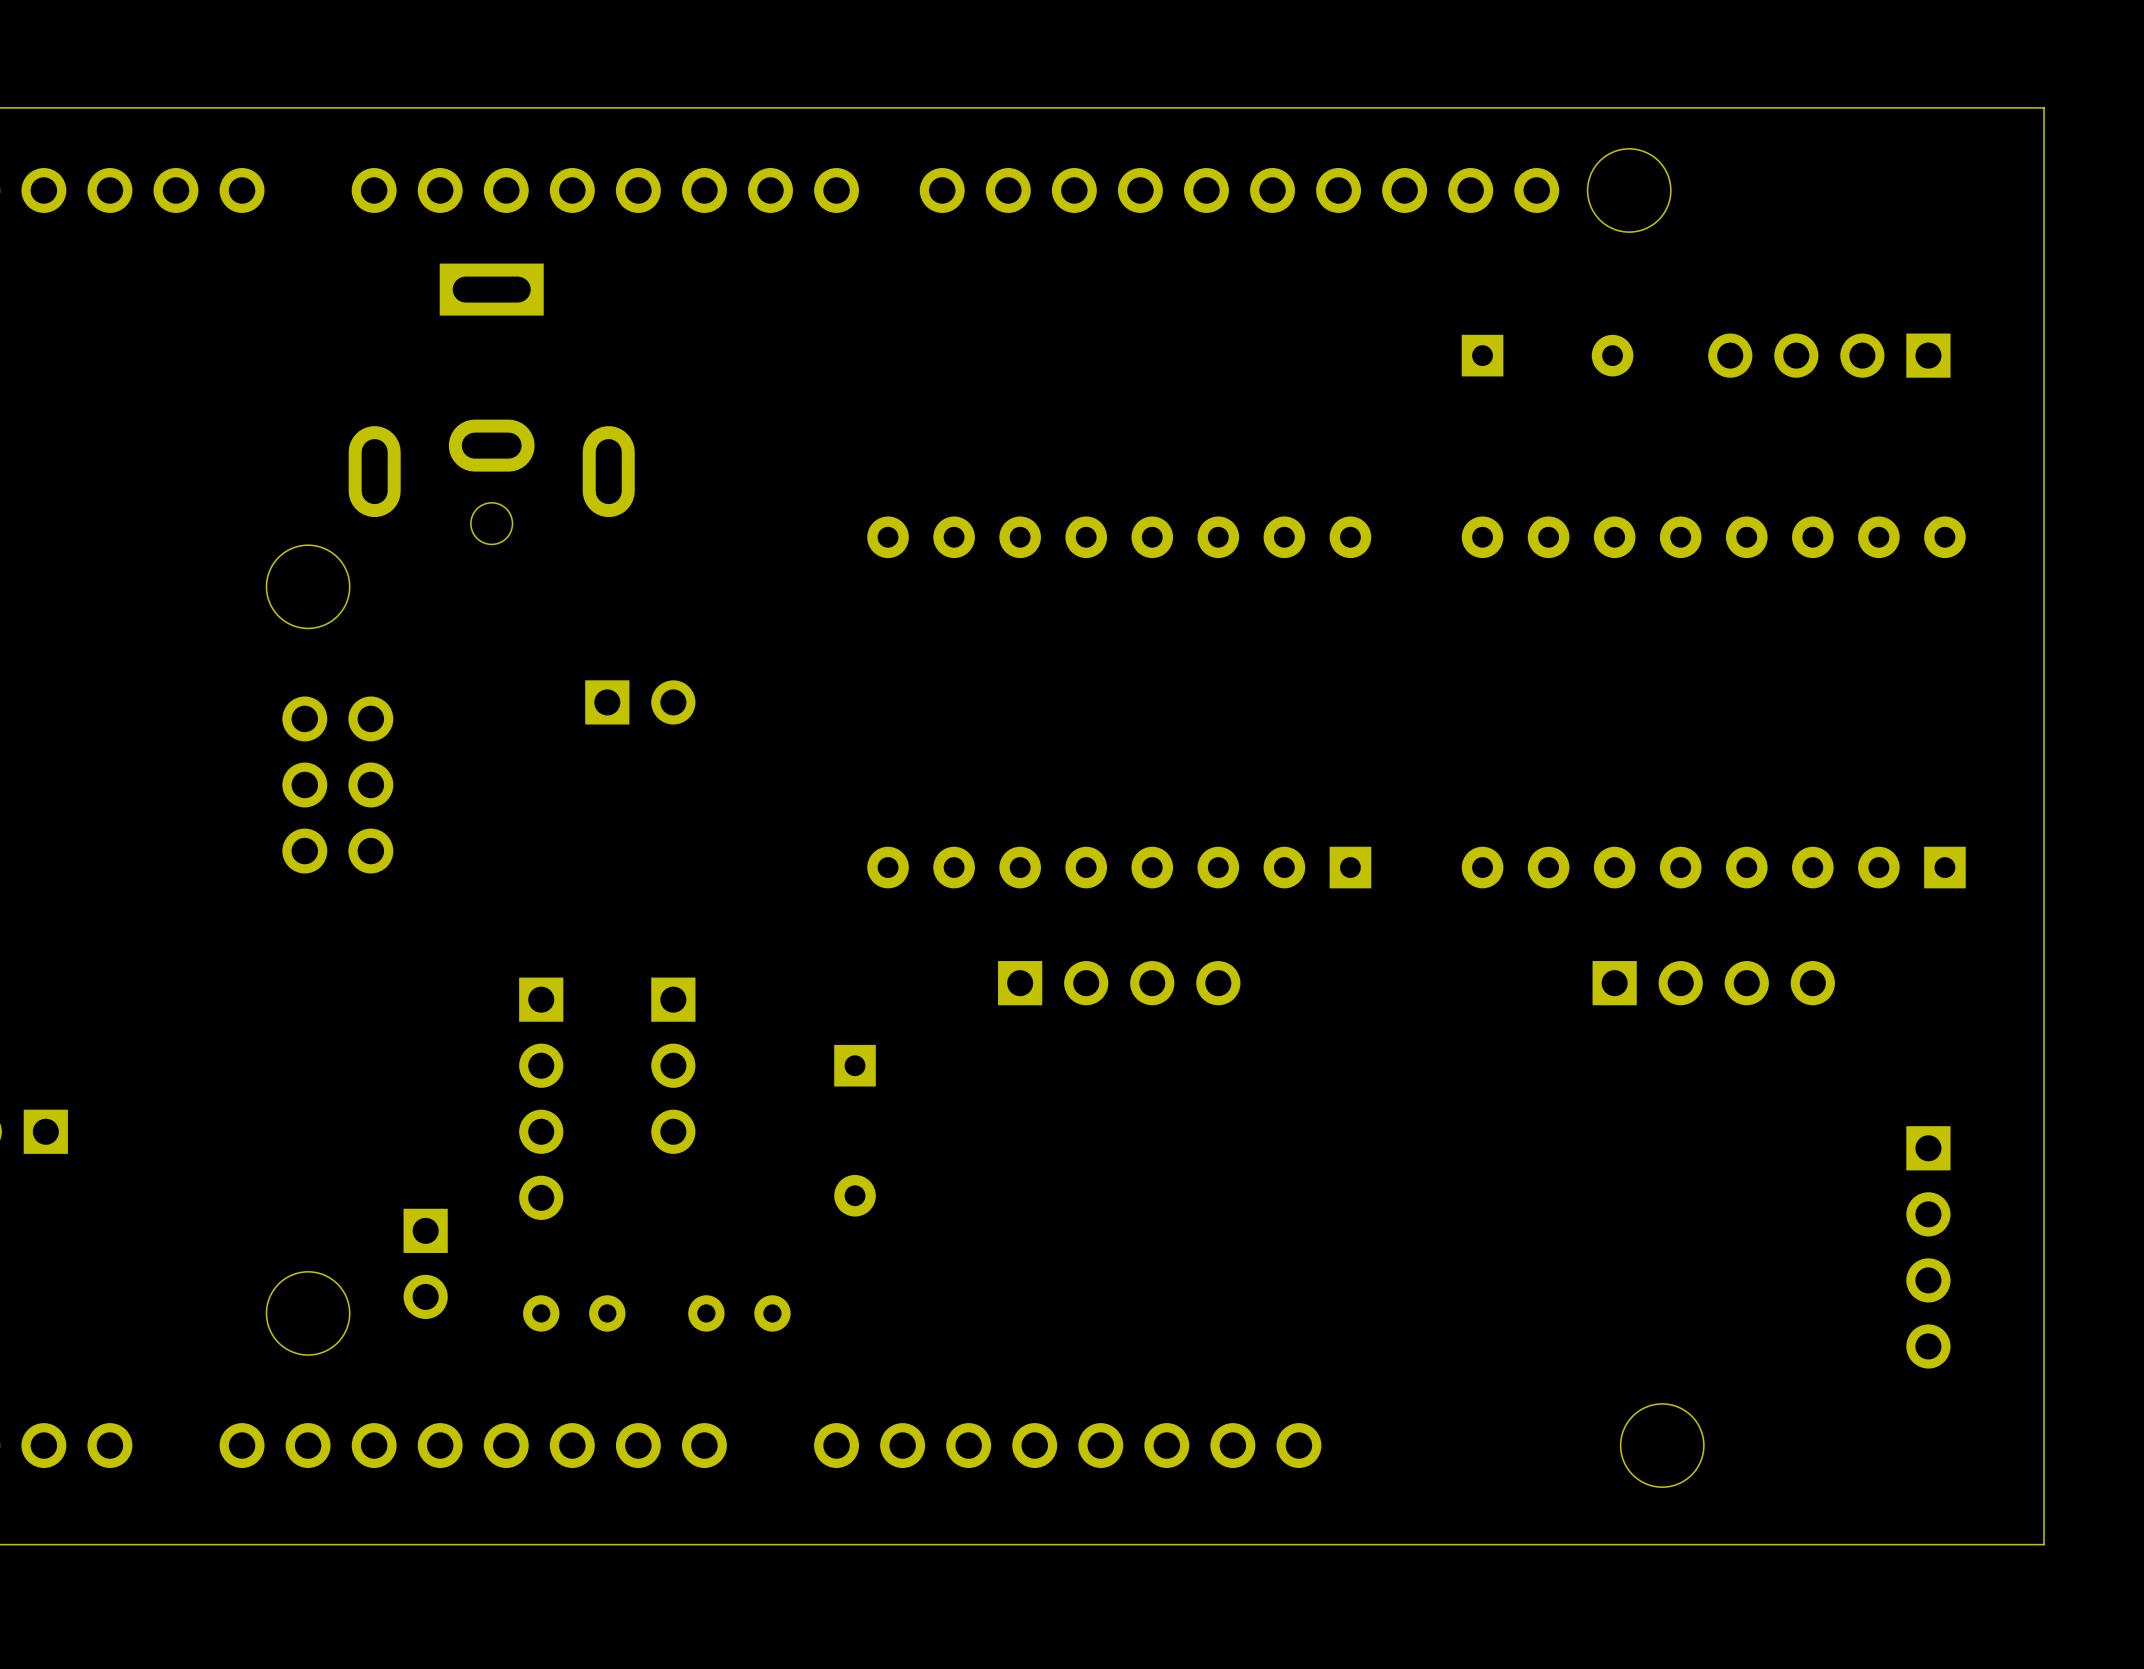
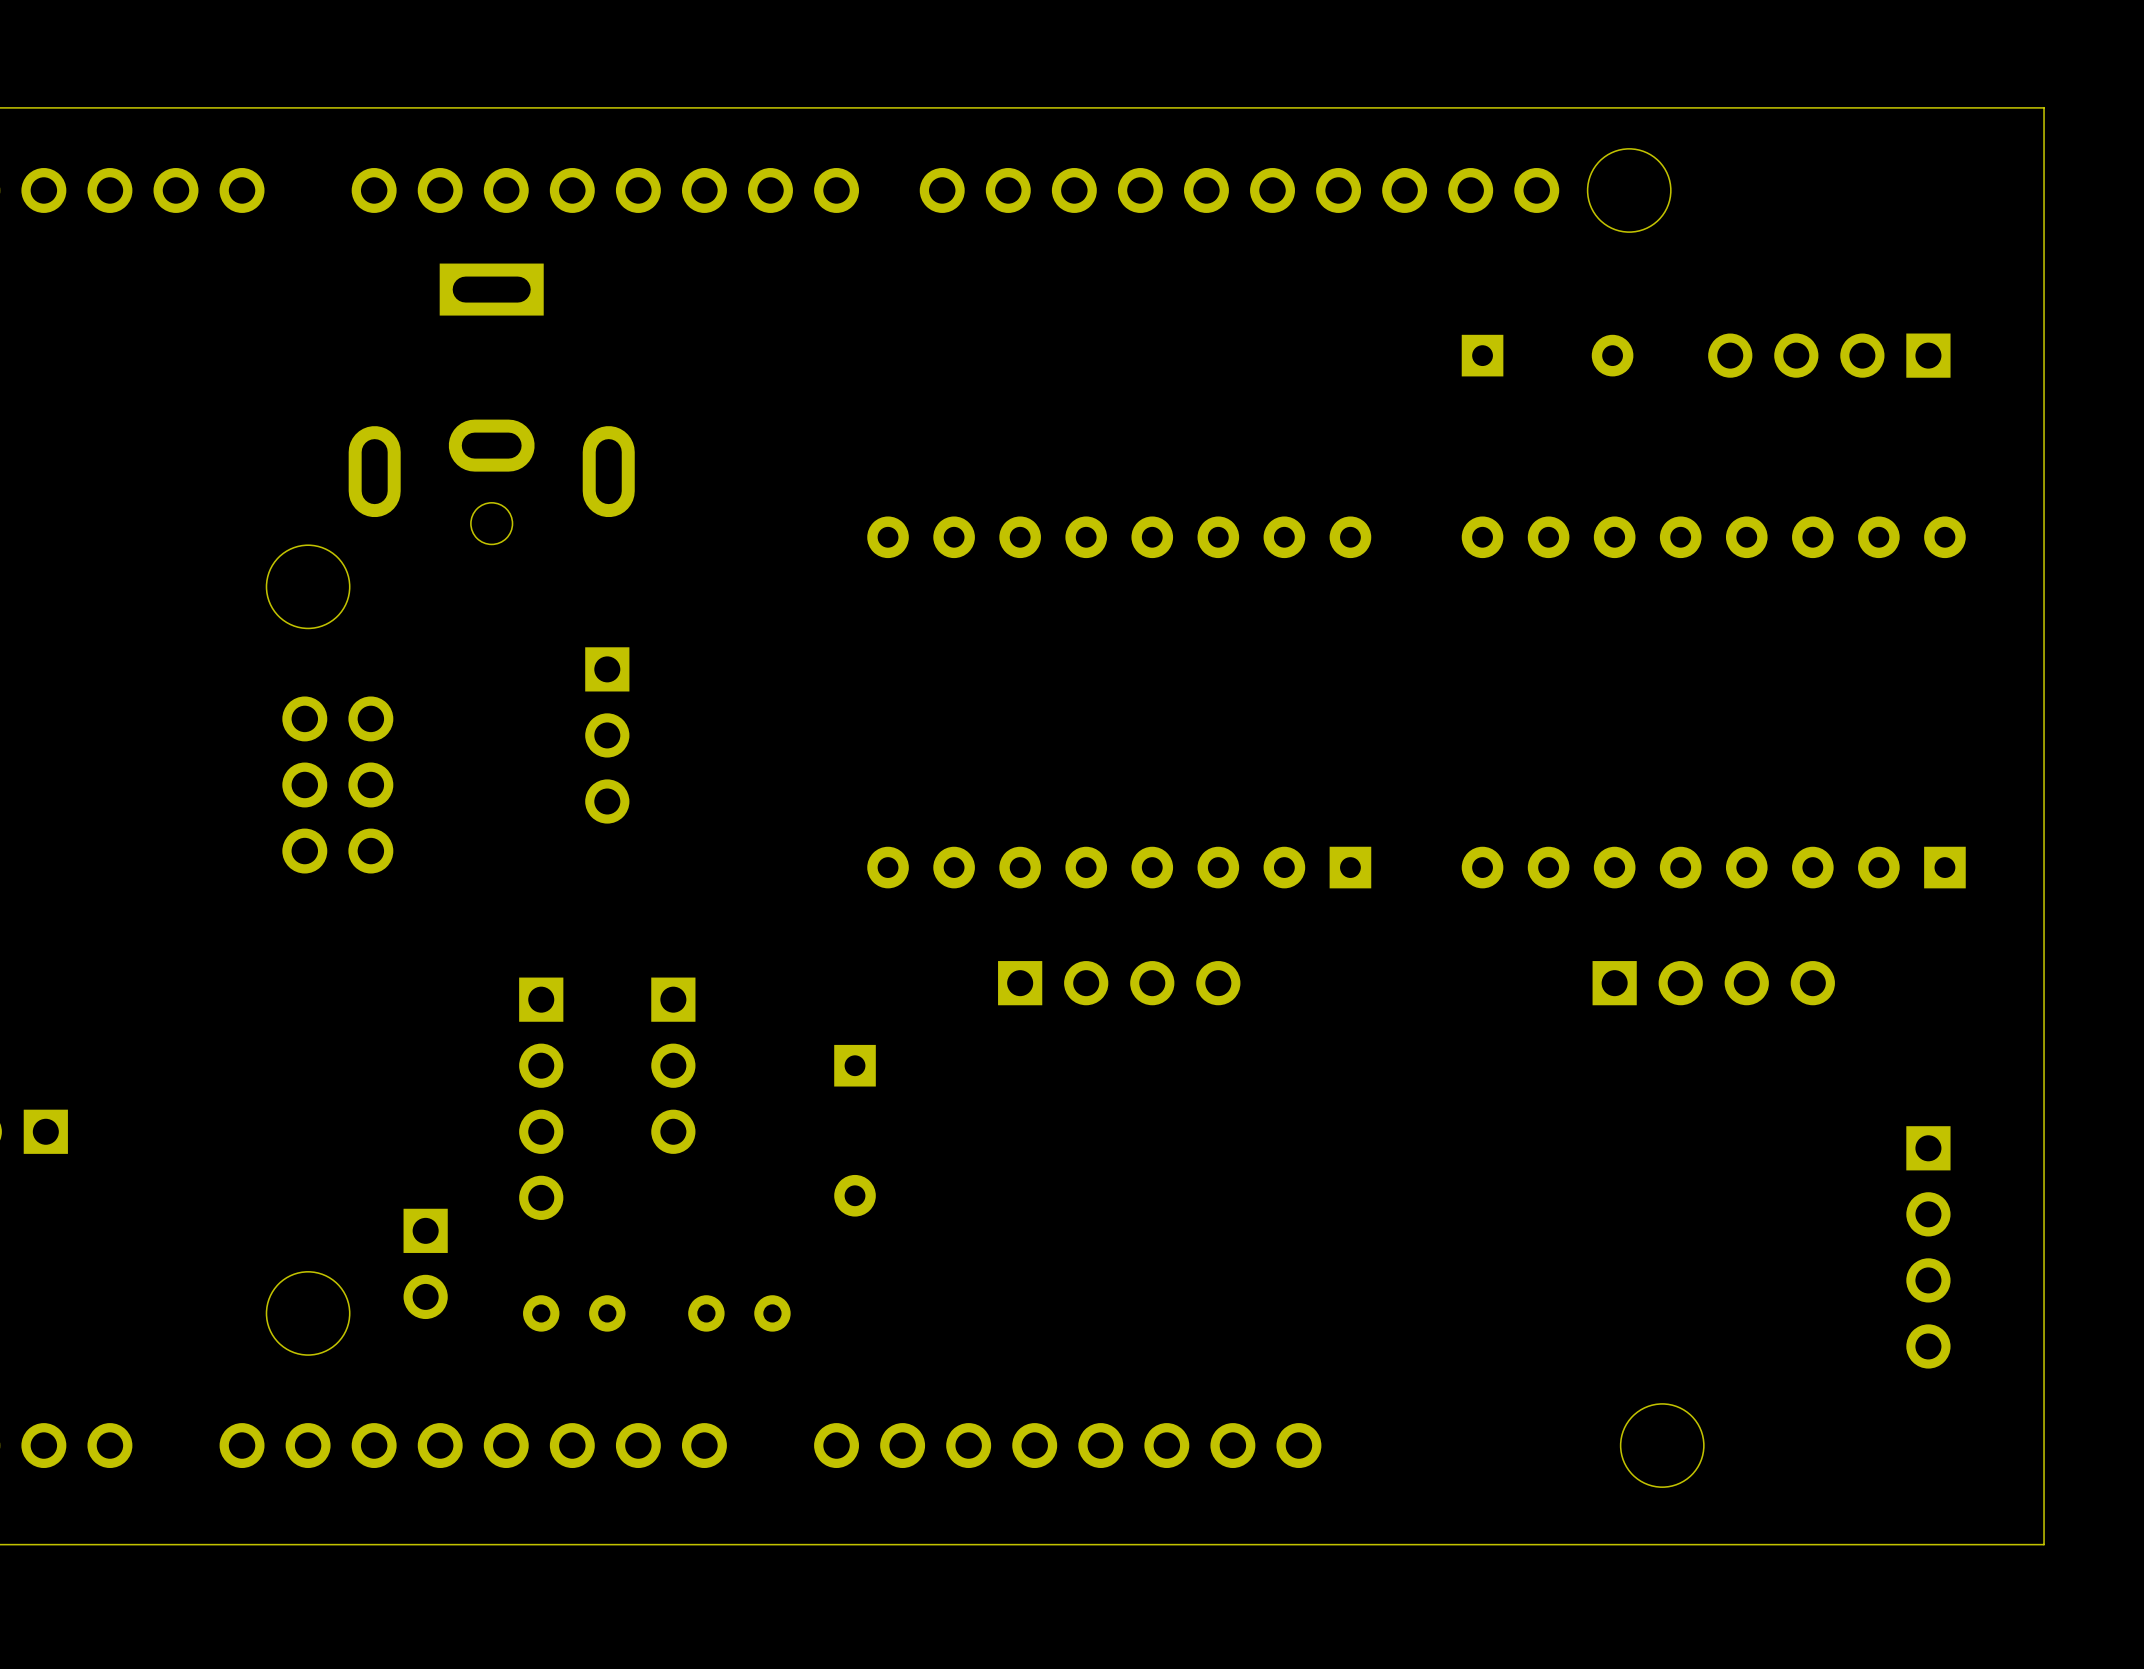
part: (640, 702) -> none
part: none -> (607, 735)

